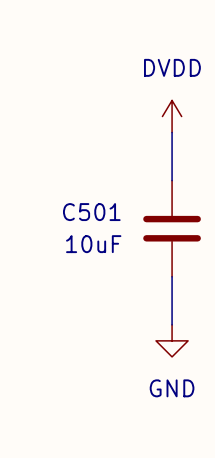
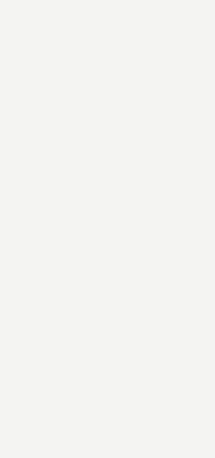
power symbol: DVDD (172, 116) -> none
wire: (172, 132) (172, 180) -> none
C501: 10uF (172, 228) -> none
wire: (172, 276) (172, 324) -> none
power symbol: GND (172, 340) -> none

